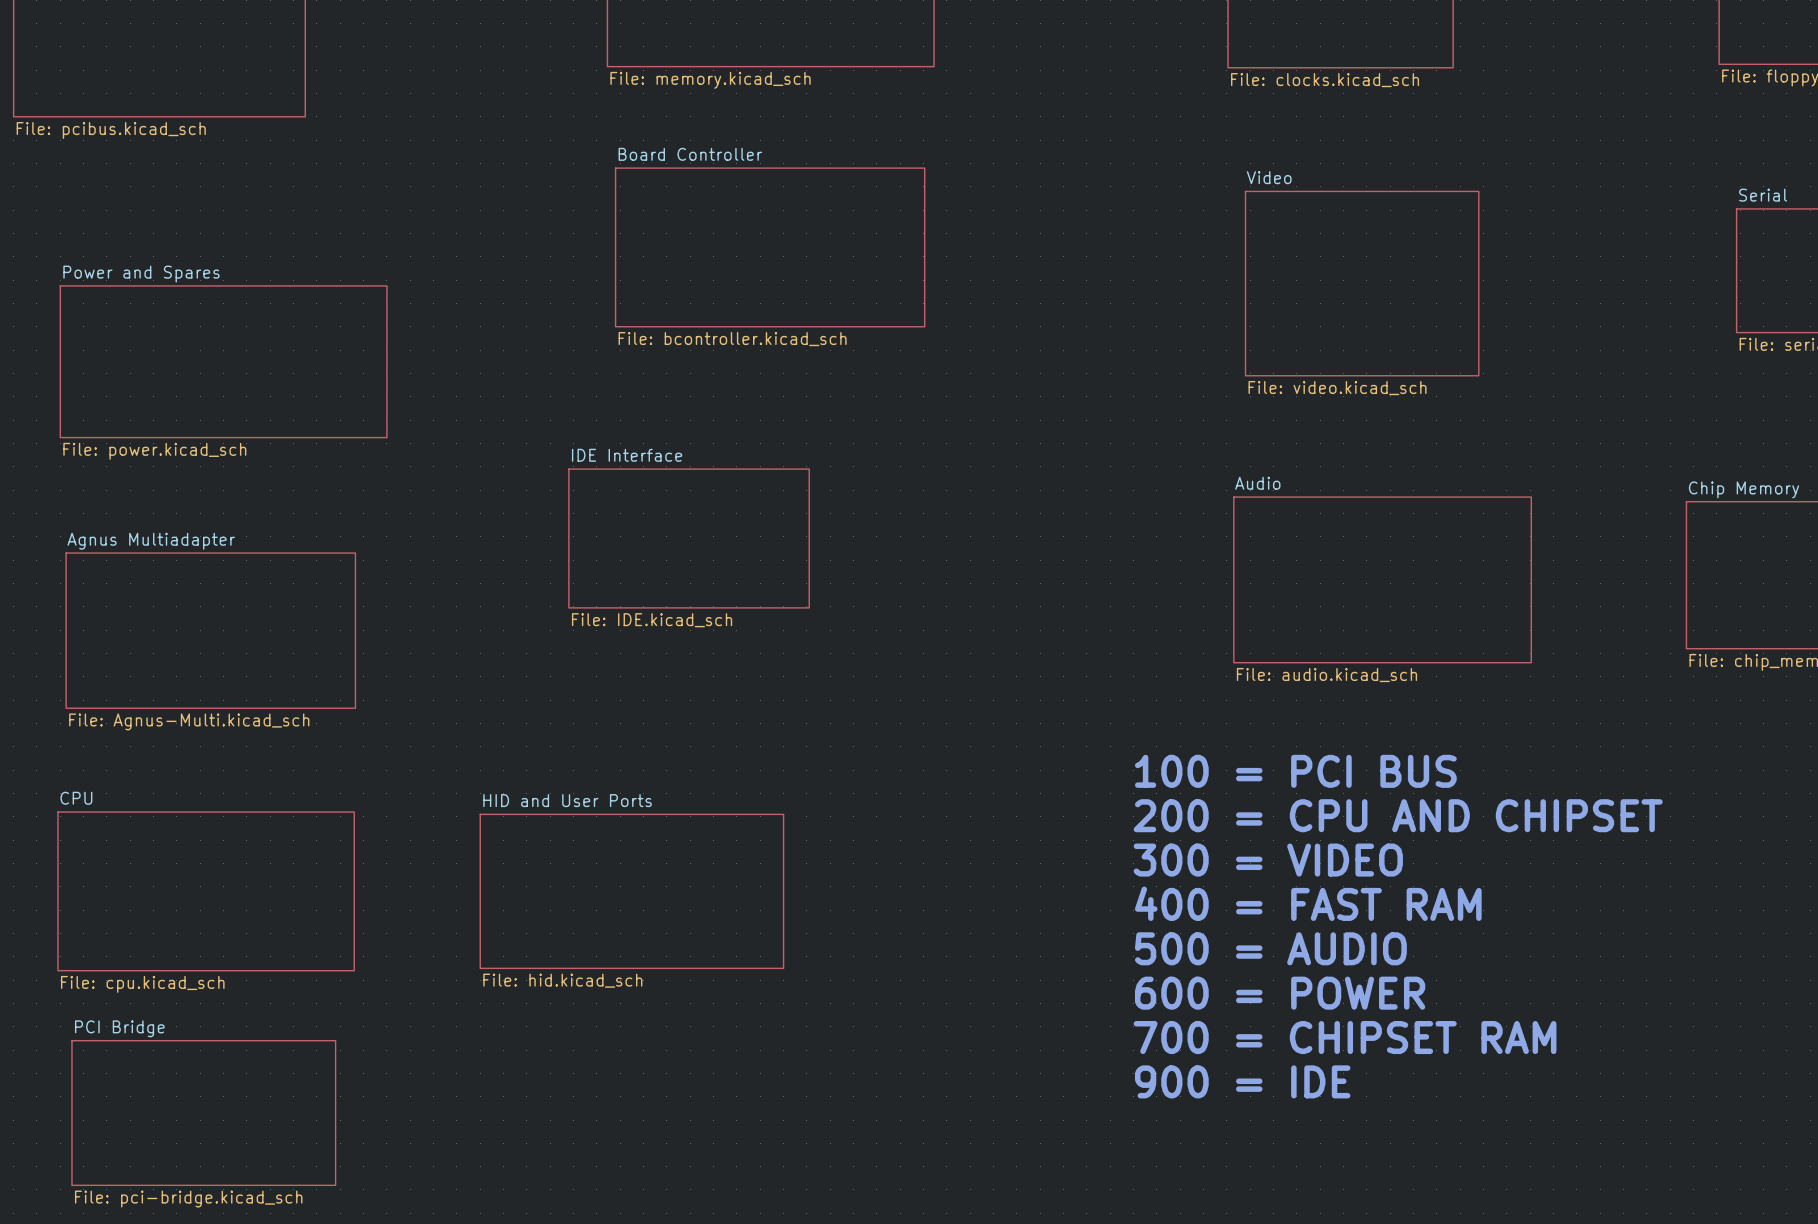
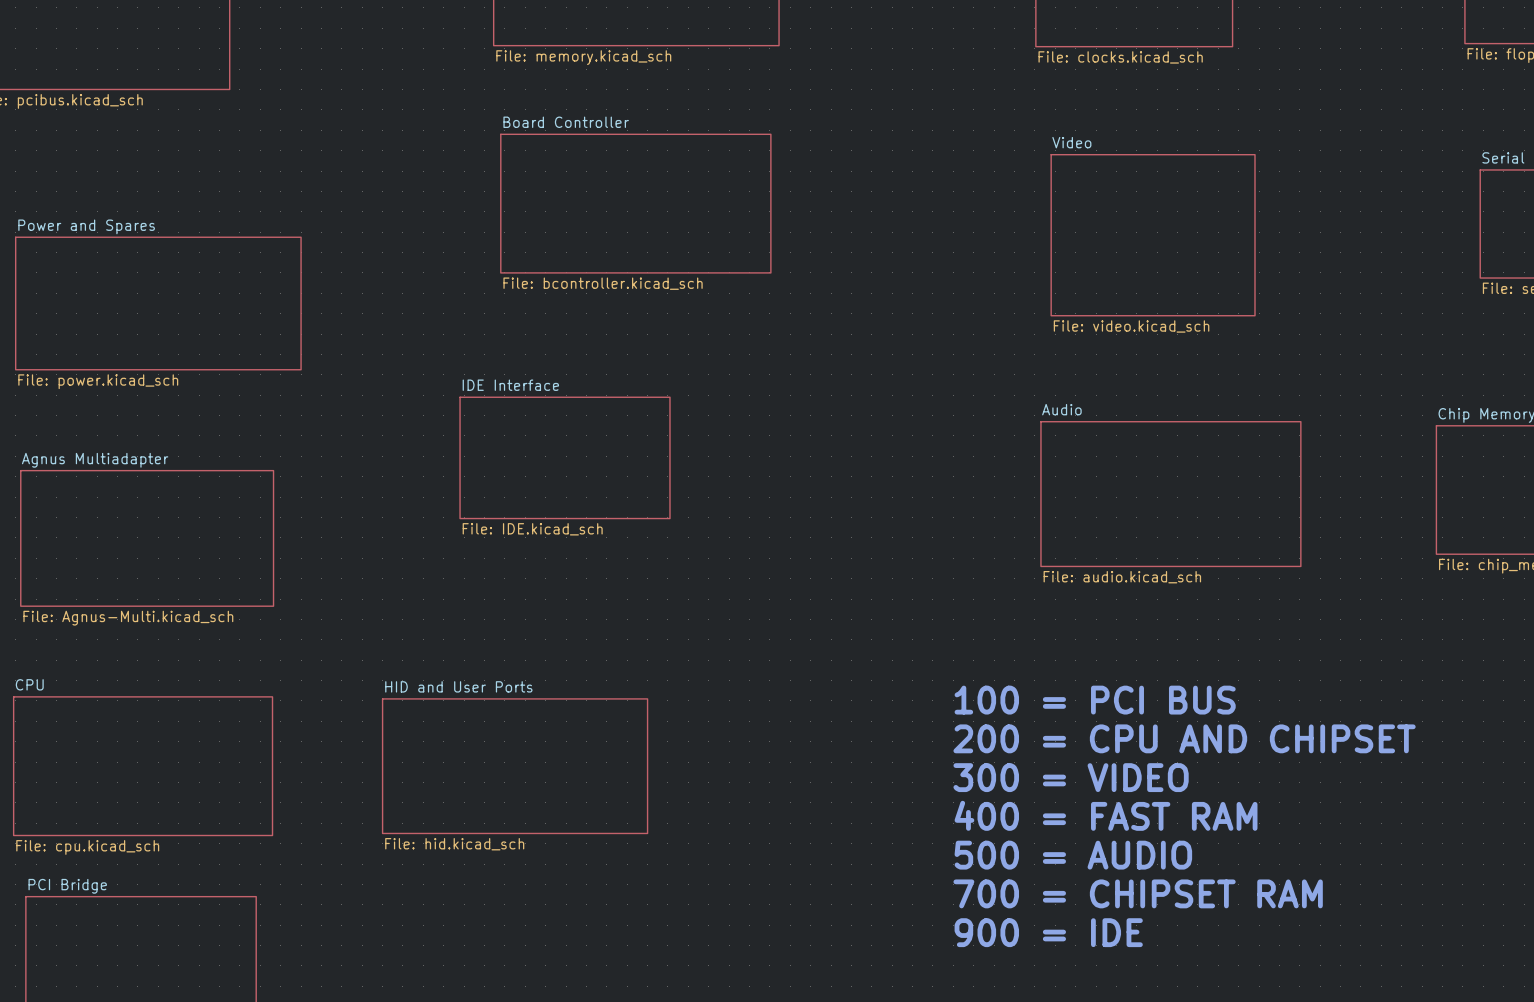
text: 100 = PCI BUS (1295, 771) -> none
text: 200 = CPU AND CHIPSET (1398, 815) -> 100 = PCI BUS (1095, 700)
text: 300 = VIDEO (1268, 860) -> 200 = CPU AND CHIPSET (1184, 738)
text: 400 = FAST RAM (1308, 903) -> 300 = VIDEO (1071, 777)
text: 500 = AUDIO (1270, 948) -> 400 = FAST RAM (1106, 815)
text: 600 = POWER (1280, 993) -> 500 = AUDIO (1073, 855)

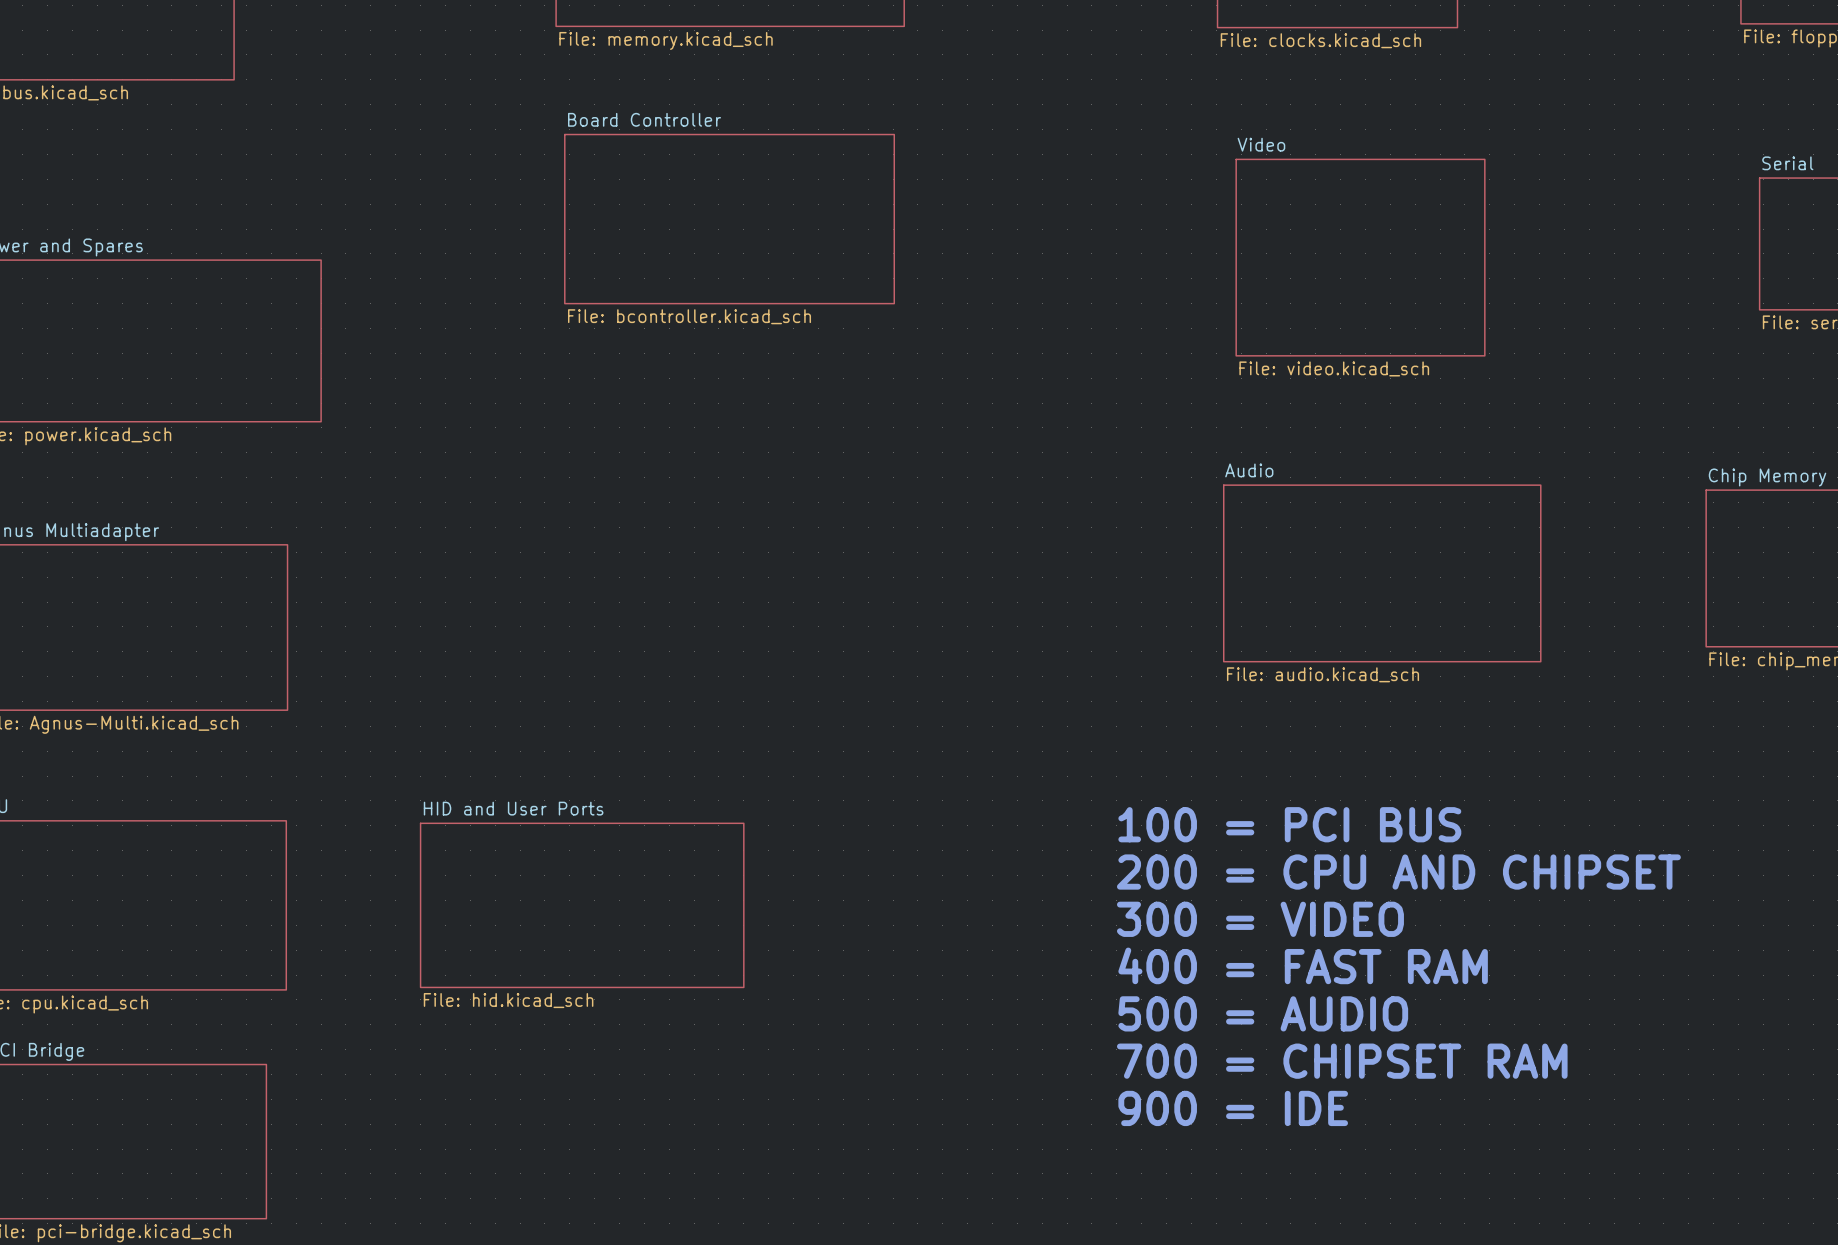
sheet IDE Interface: File: IDE.kicad_sch (565, 457) -> none

